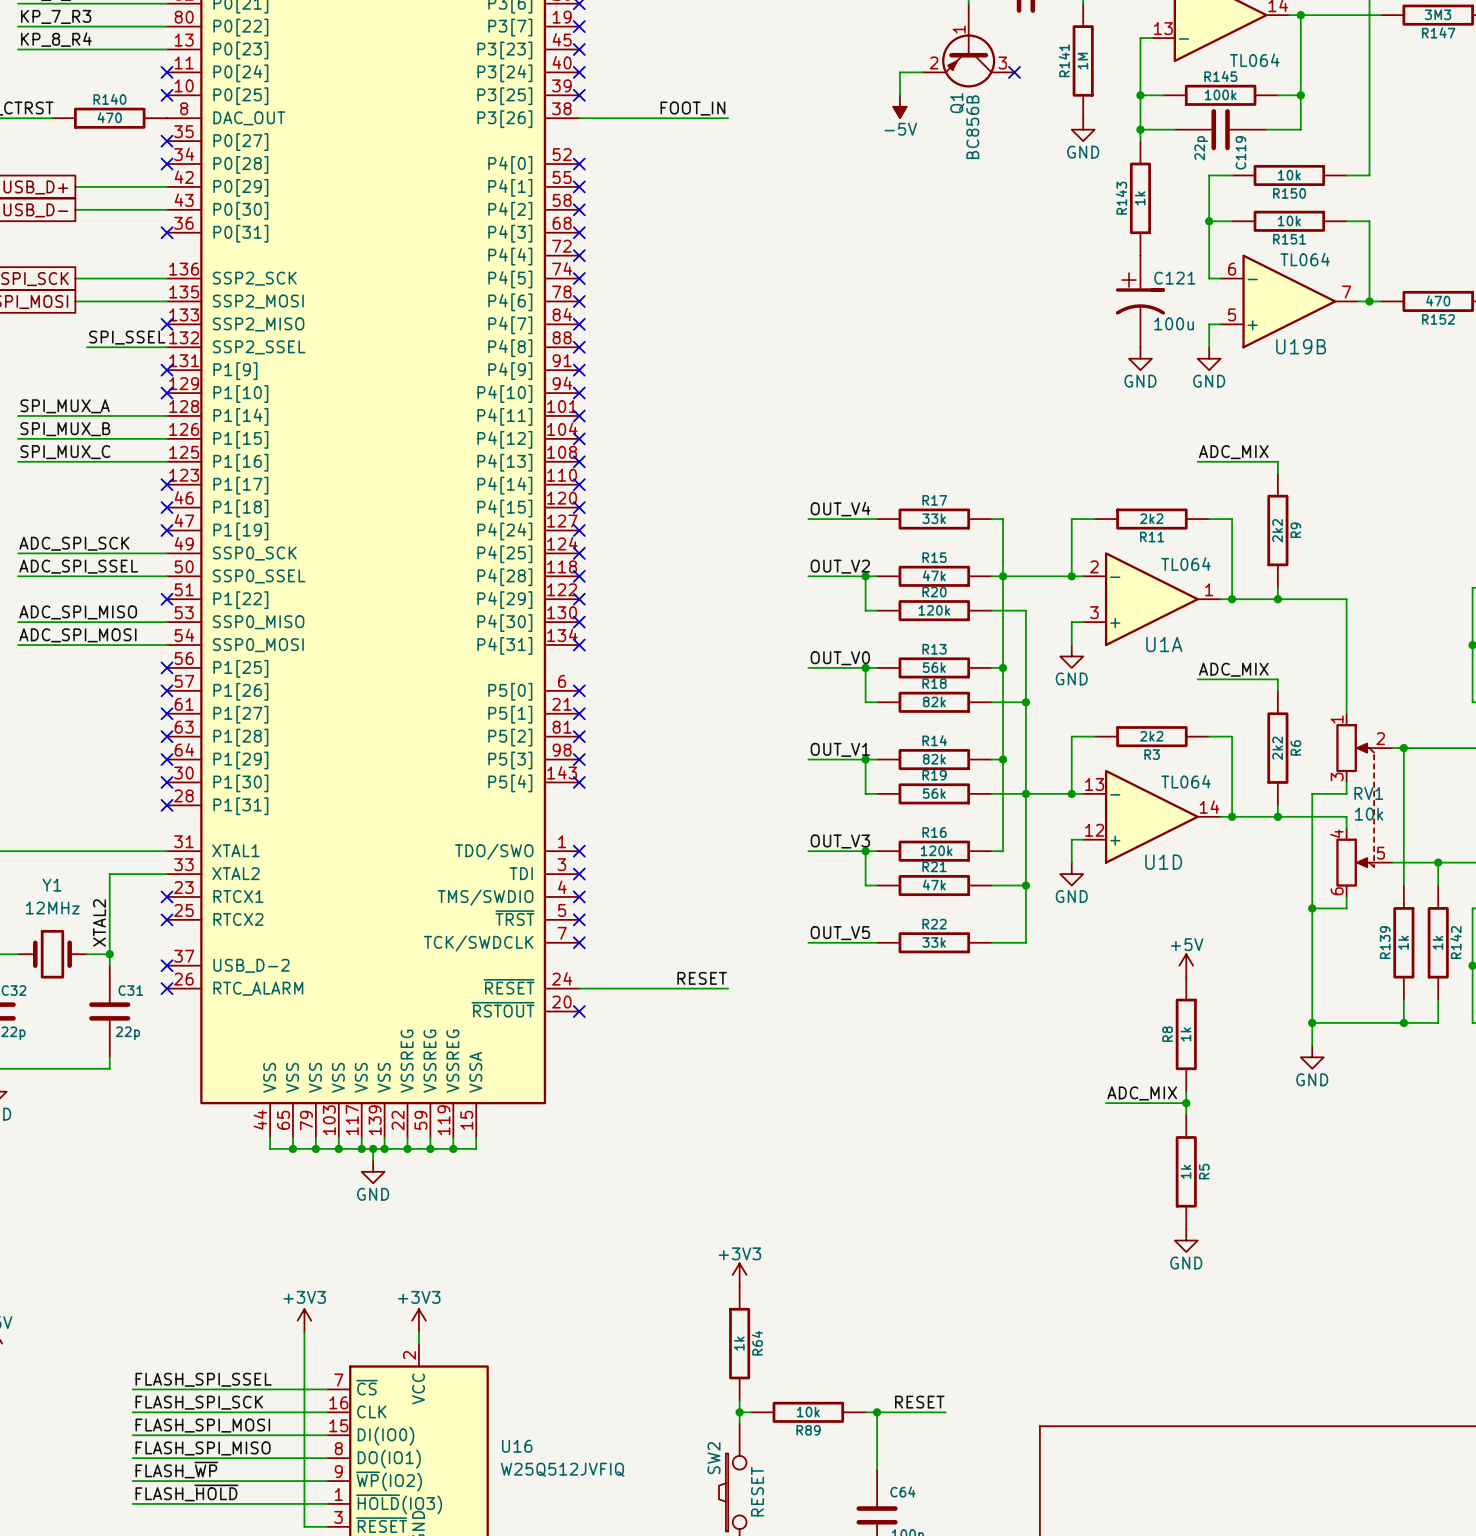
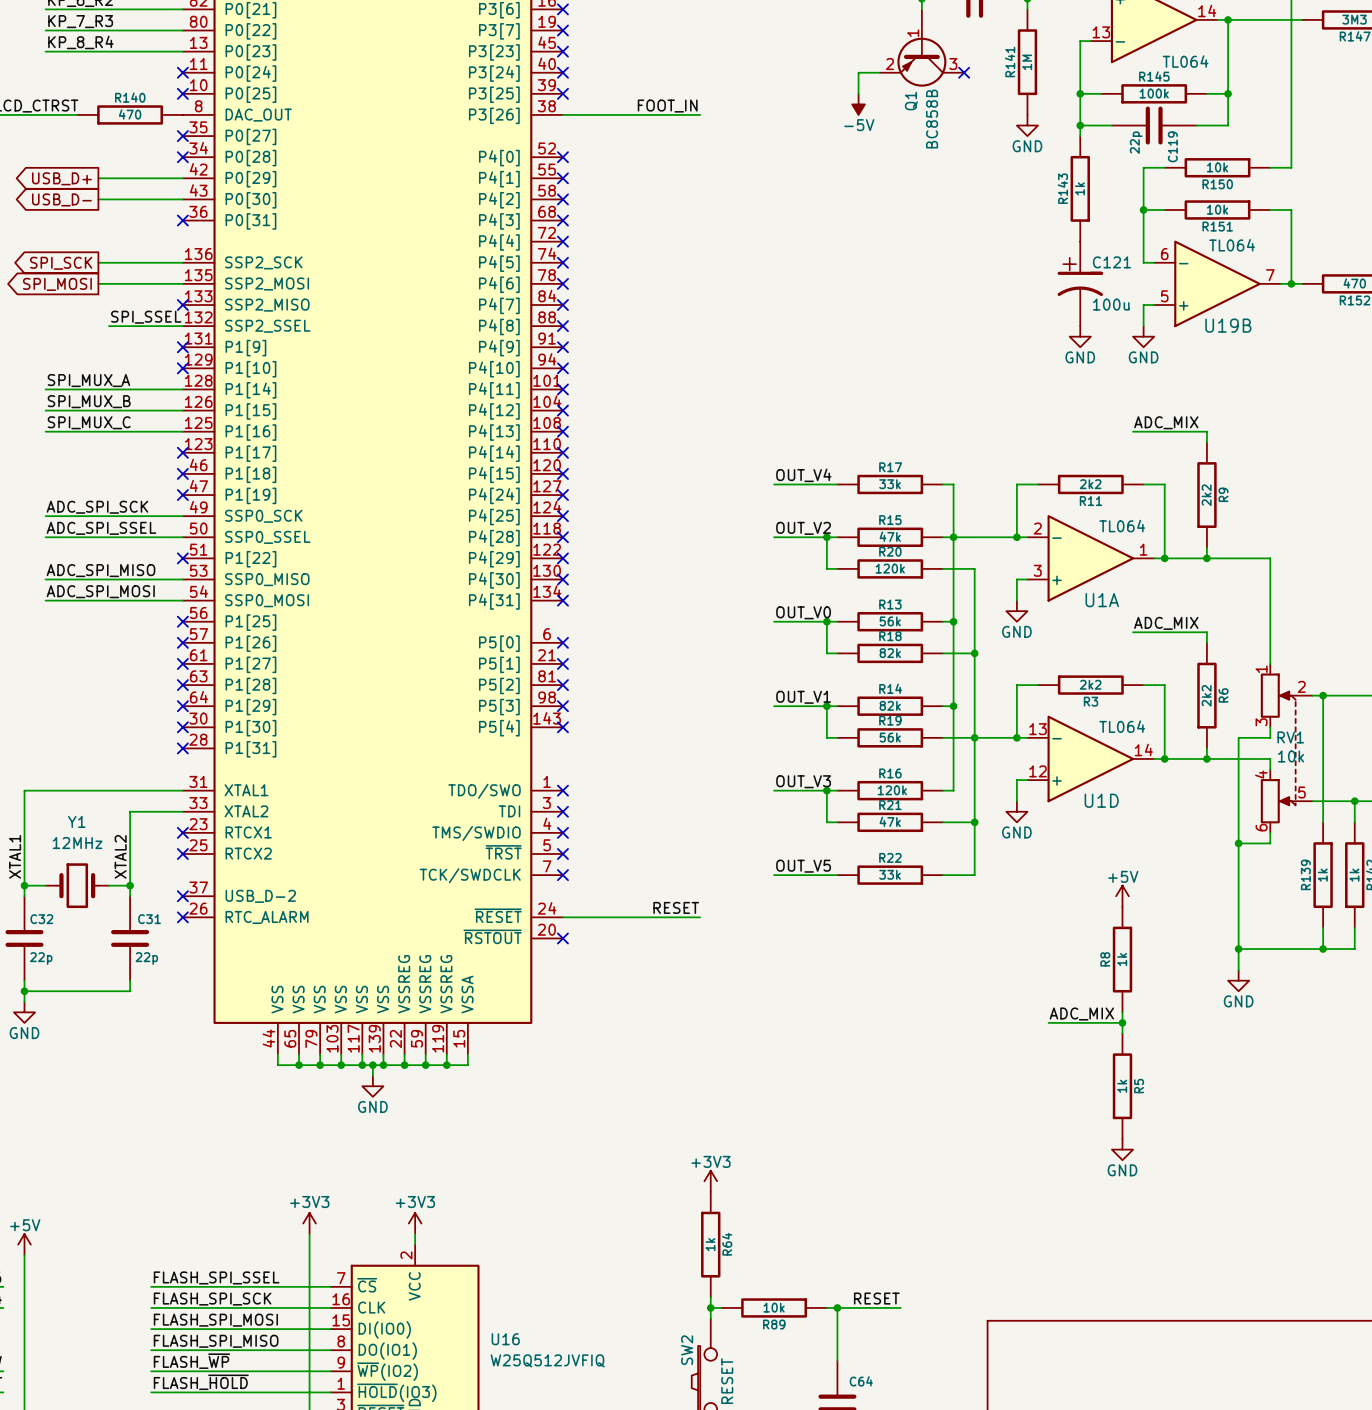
Q1 value: BC856B (972, 127) -> BC858B (932, 119)

